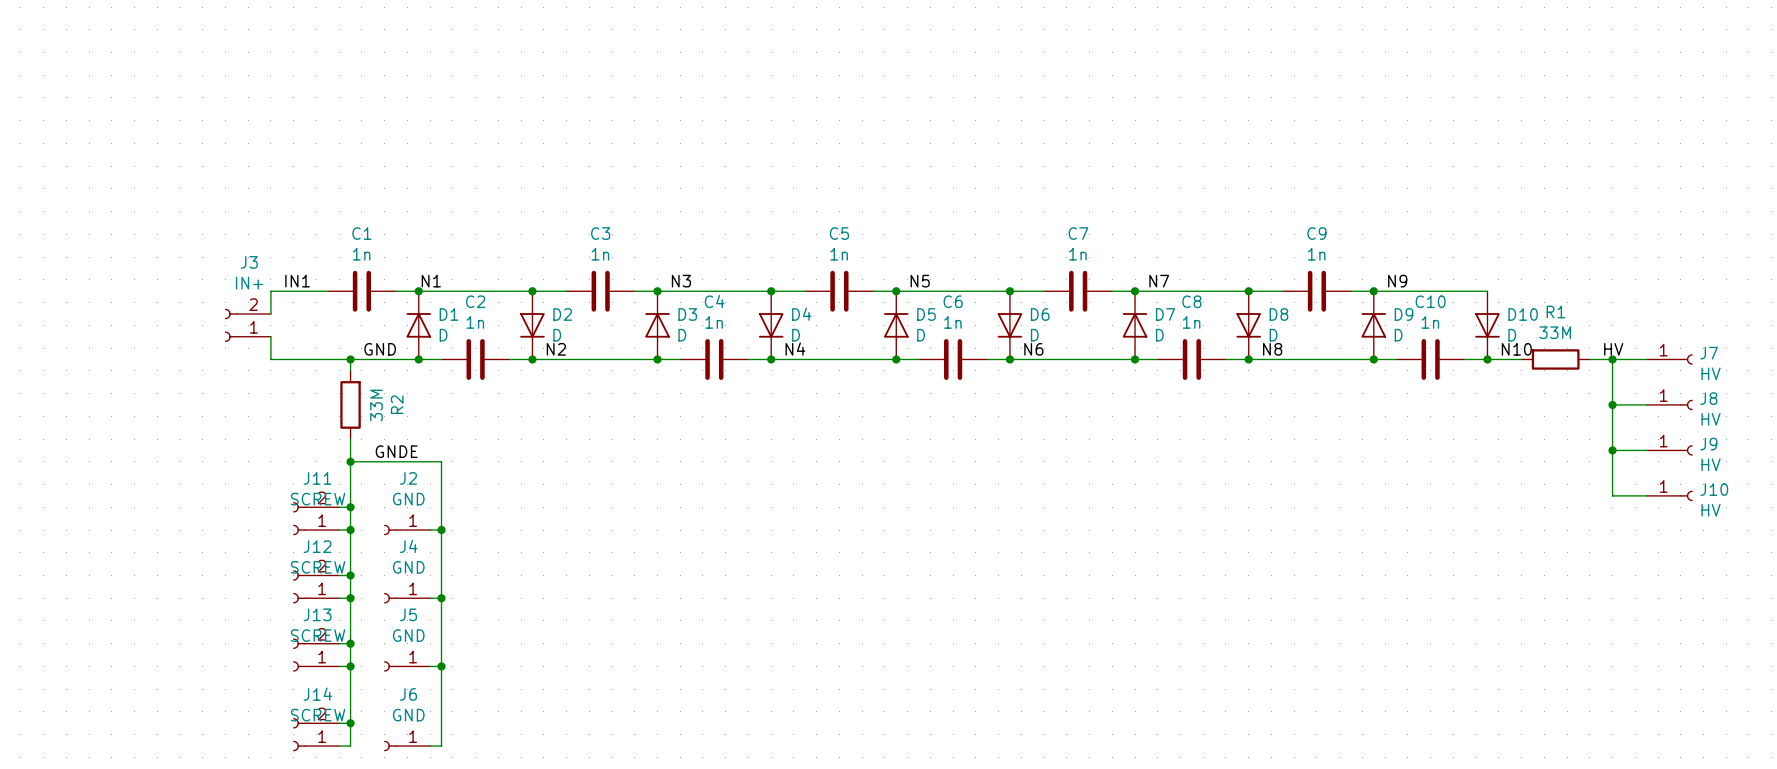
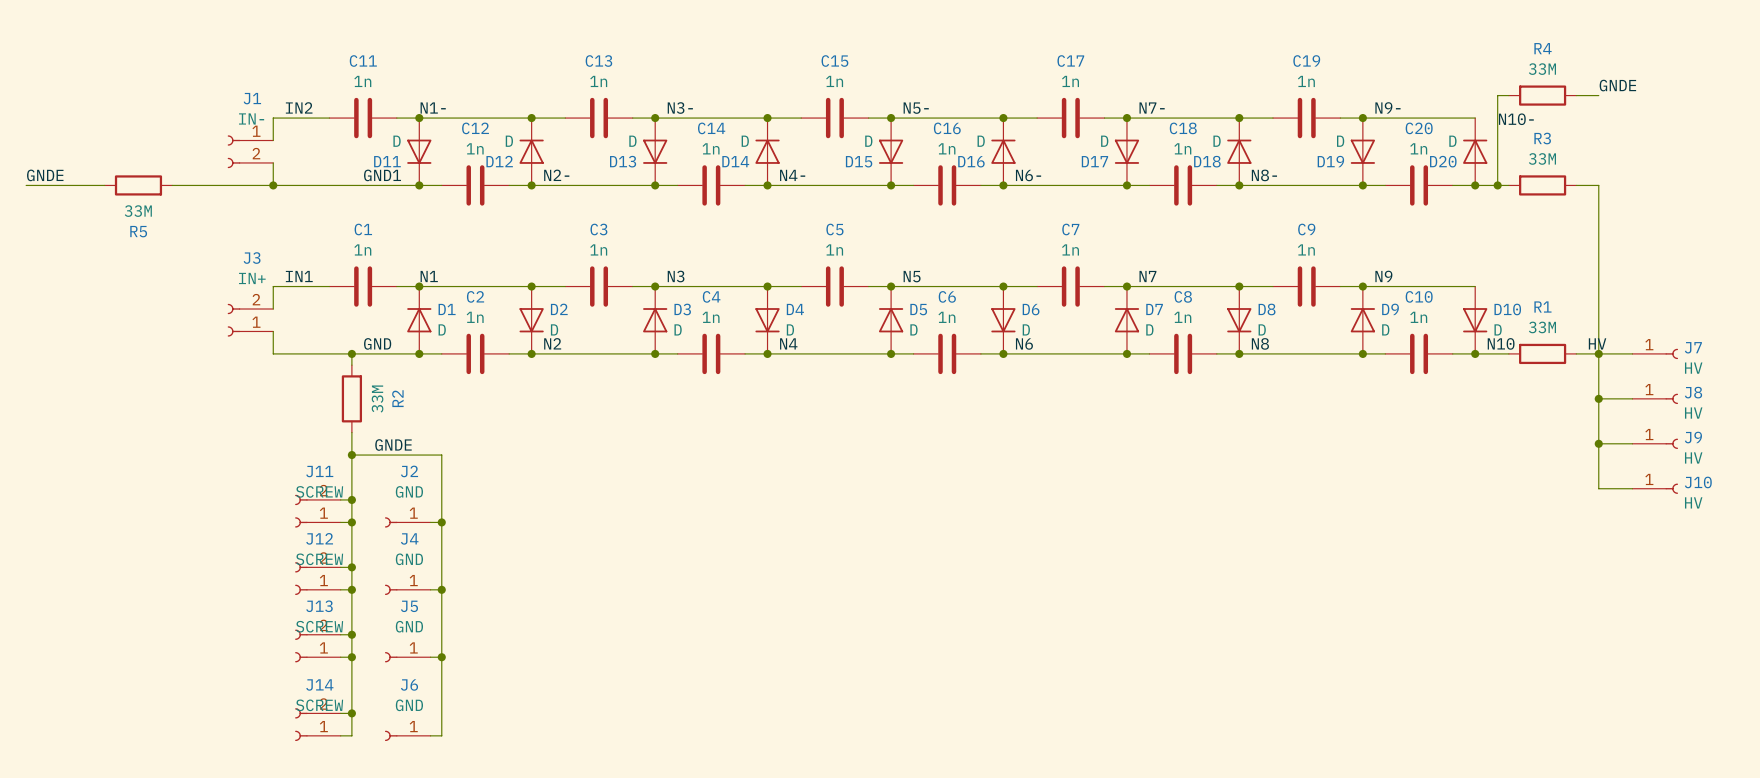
label: none -> GNDE (1617, 85)
wire: none -> (1508, 95) (1497, 95) (1497, 185)
R4: none -> 33M (1542, 95)
wire: none -> (1576, 95) (1598, 95)
label: none -> IN2 (299, 107)
label: none -> N1- (433, 108)
label: none -> N3- (680, 108)
label: none -> N5- (916, 108)
label: none -> N7- (1152, 108)
label: none -> N9- (1387, 107)
wire: none -> (329, 118) (273, 118) (273, 140)
C11: none -> 1n (363, 118)
wire: none -> (396, 118) (565, 118)
junction: none -> (419, 118)
junction: none -> (531, 118)
C13: none -> 1n (599, 118)
wire: none -> (632, 118) (801, 118)
junction: none -> (655, 118)
junction: none -> (767, 118)
C15: none -> 1n (834, 118)
wire: none -> (868, 118) (1037, 118)
junction: none -> (891, 118)
junction: none -> (1003, 118)
C17: none -> 1n (1070, 118)
wire: none -> (1104, 118) (1273, 118)
junction: none -> (1126, 118)
junction: none -> (1239, 118)
C19: none -> 1n (1306, 118)
wire: none -> (1340, 118) (1475, 118)
junction: none -> (1362, 118)
label: none -> N10- (1516, 119)
J1: none -> IN- (250, 151)
D11: none -> D (419, 151)
D12: none -> D (531, 151)
D13: none -> D (655, 151)
D14: none -> D (767, 151)
D15: none -> D (891, 151)
D16: none -> D (1003, 151)
D17: none -> D (1126, 151)
D18: none -> D (1239, 151)
D19: none -> D (1362, 151)
D20: none -> D (1475, 151)
wire: none -> (273, 162) (273, 185)
label: none -> GNDE (45, 175)
label: none -> GND1 (382, 175)
label: none -> N2- (556, 175)
label: none -> N4- (792, 175)
label: none -> N6- (1028, 175)
label: none -> N8- (1264, 175)
wire: none -> (26, 185) (104, 185)
R5: none -> 33M (138, 185)
wire: none -> (172, 185) (441, 185)
junction: none -> (273, 185)
junction: none -> (419, 185)
C12: none -> 1n (475, 185)
wire: none -> (509, 185) (677, 185)
junction: none -> (531, 185)
junction: none -> (655, 185)
C14: none -> 1n (711, 185)
wire: none -> (745, 185) (913, 185)
junction: none -> (767, 185)
junction: none -> (891, 185)
C16: none -> 1n (947, 185)
wire: none -> (980, 185) (1149, 185)
junction: none -> (1003, 185)
junction: none -> (1126, 185)
C18: none -> 1n (1183, 185)
wire: none -> (1216, 185) (1385, 185)
junction: none -> (1239, 185)
junction: none -> (1362, 185)
C20: none -> 1n (1419, 185)
wire: none -> (1452, 185) (1508, 185)
junction: none -> (1475, 185)
junction: none -> (1497, 185)
R3: none -> 33M (1542, 185)
wire: none -> (1576, 185) (1598, 185) (1598, 353)

